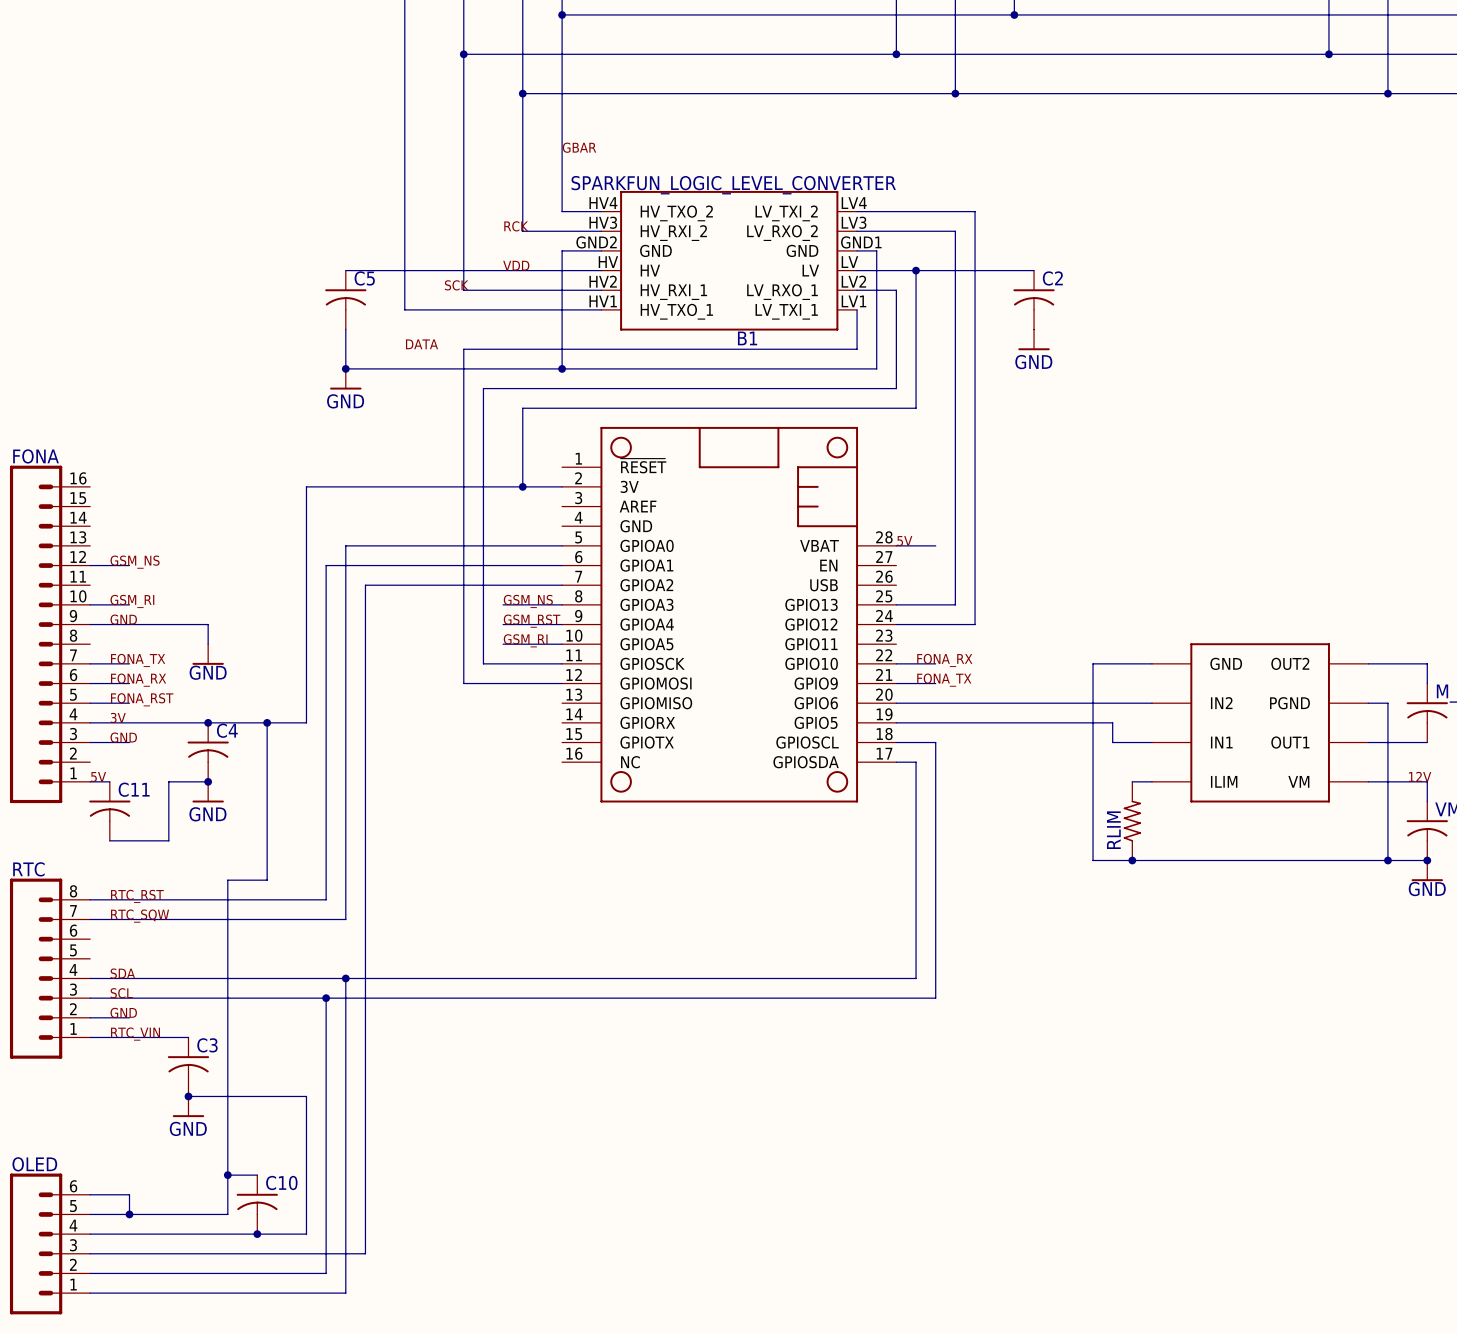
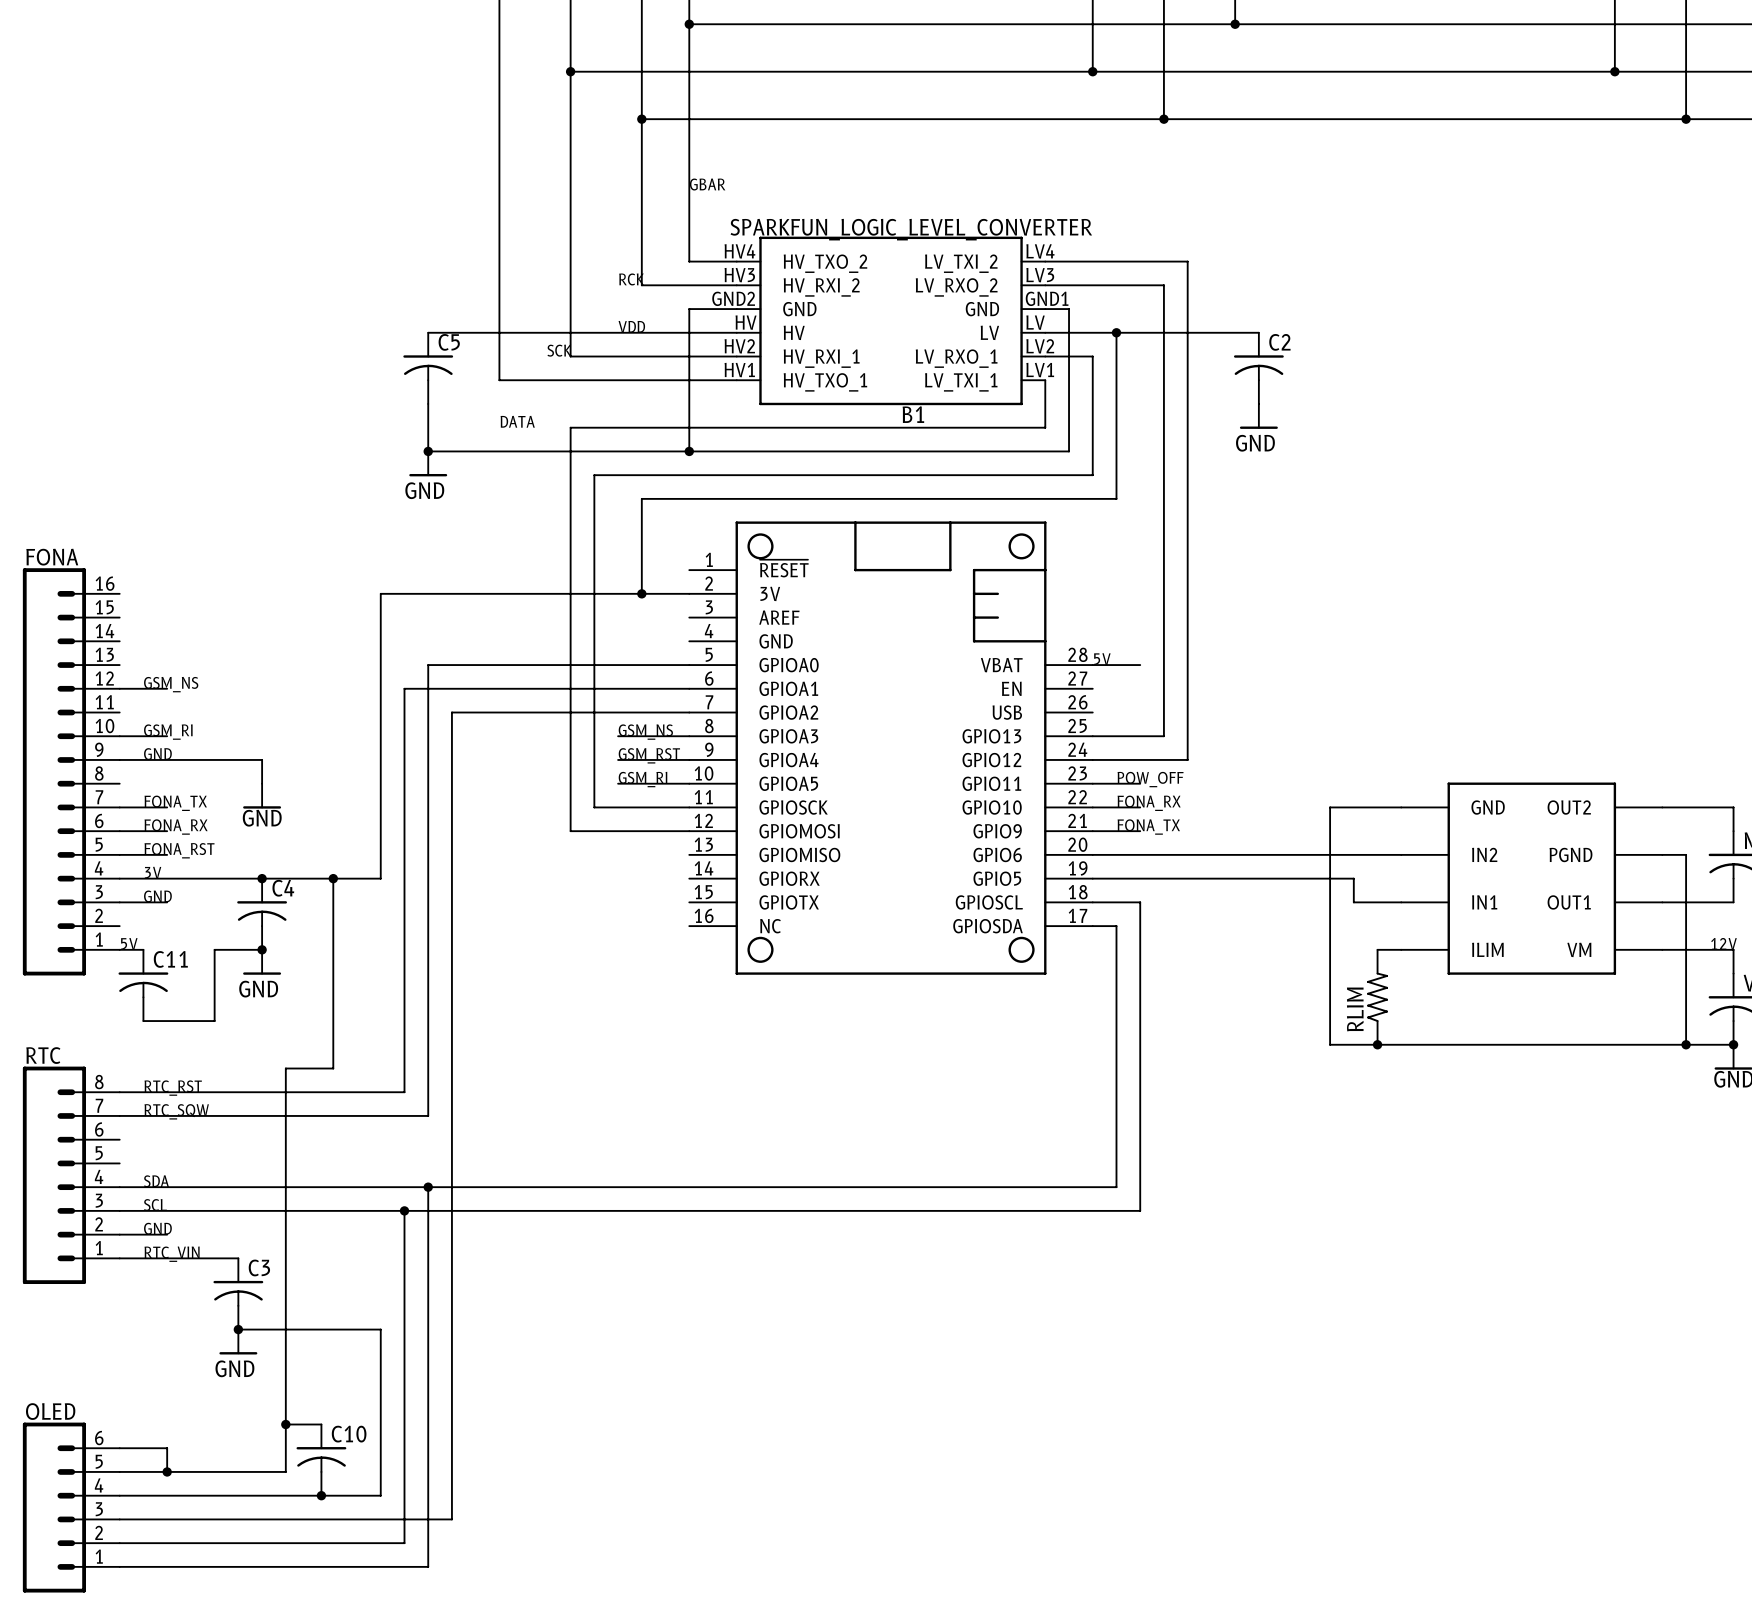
label: none -> POW_OFF (1150, 779)
wire: none -> (1092, 783) (1140, 783)

